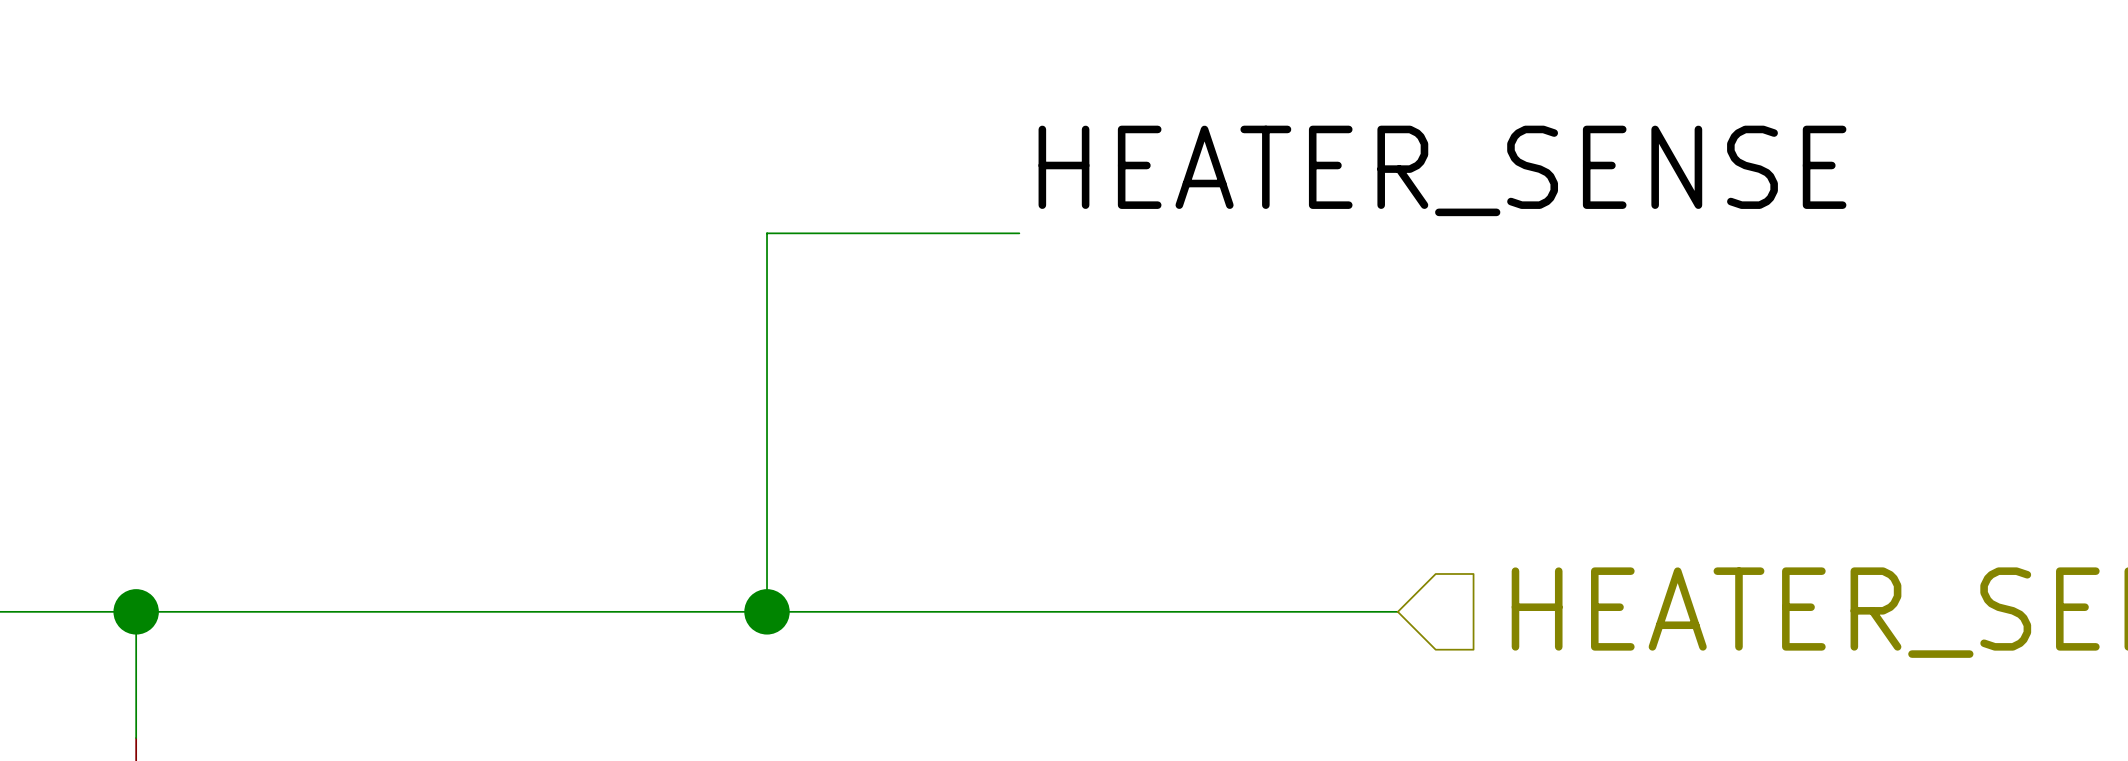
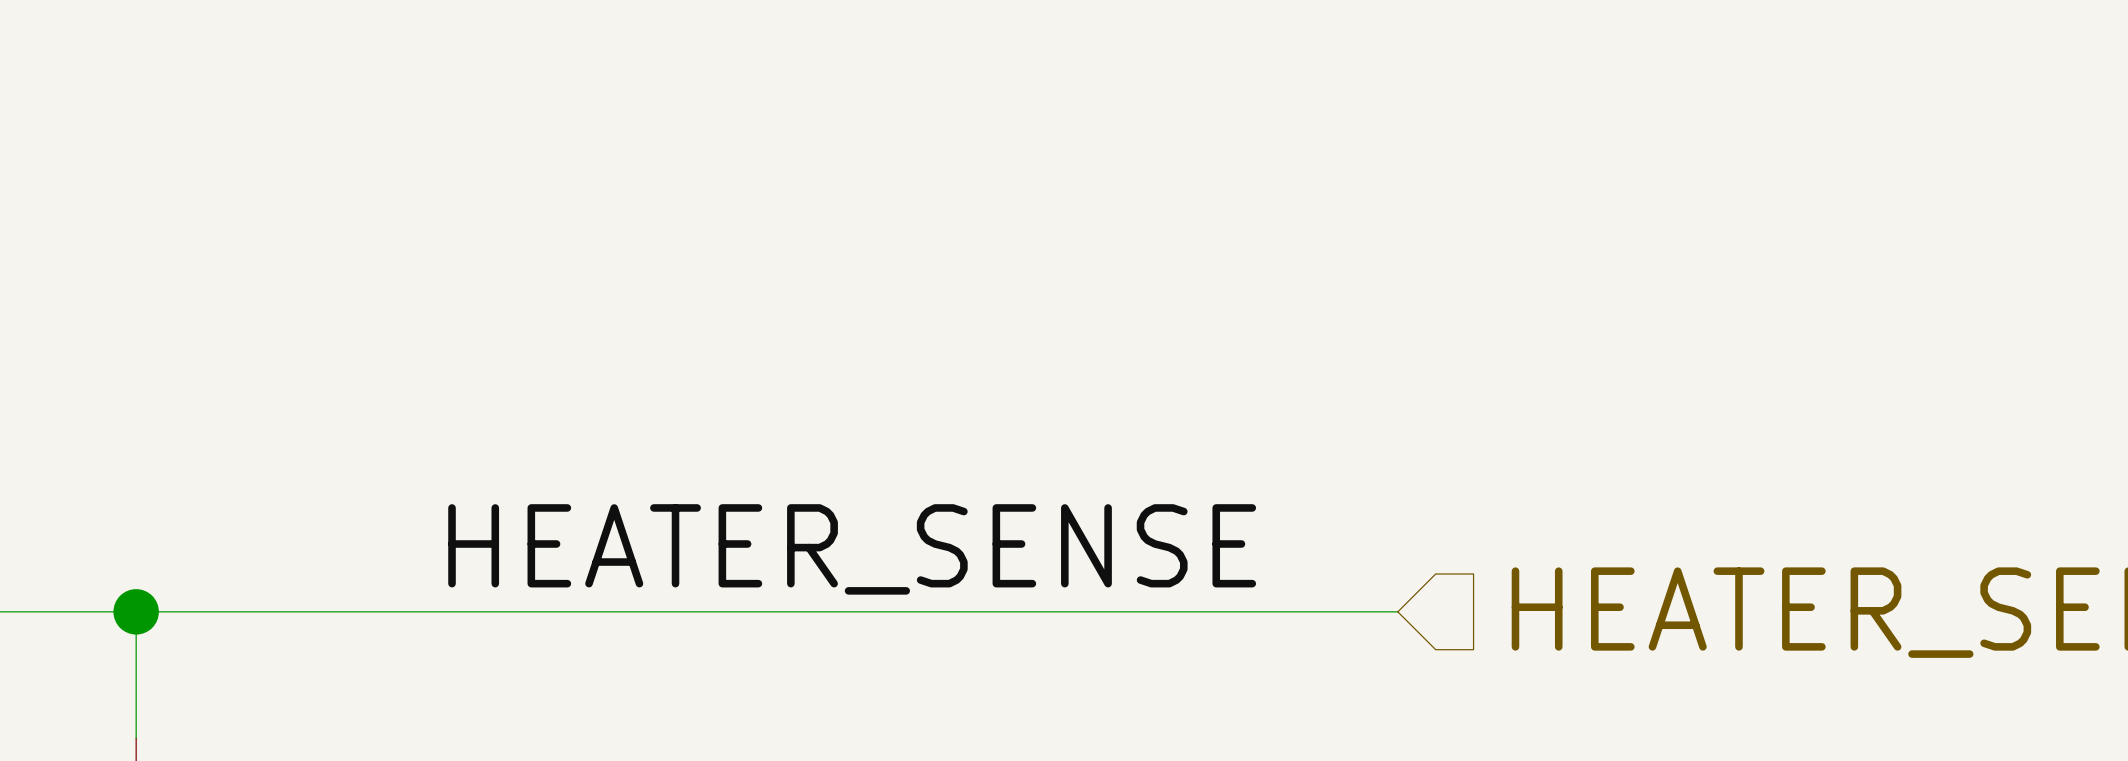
label position: HEATER_SENSE (1442, 170) -> HEATER_SENSE (852, 549)
wire: (1019, 233) (767, 233) (767, 611) -> none
junction: (767, 611) -> none

